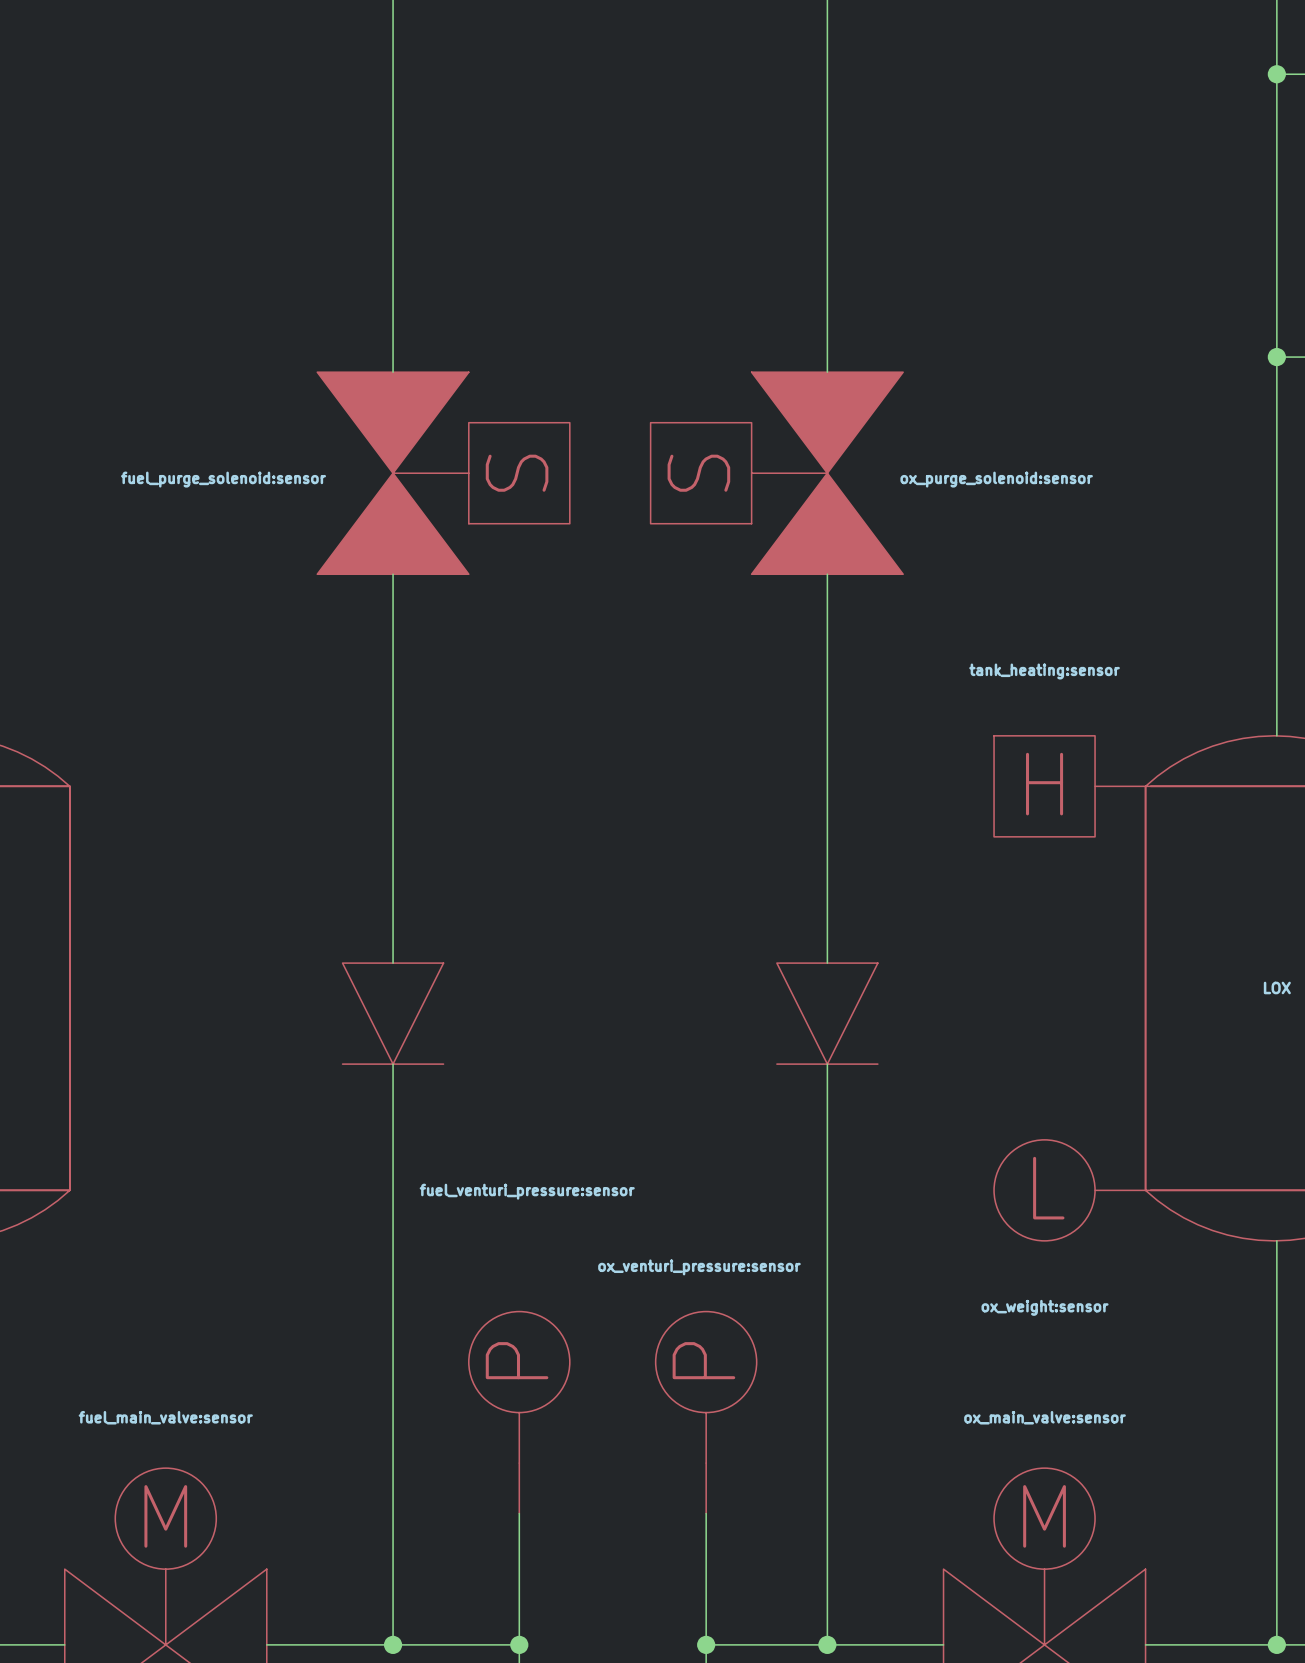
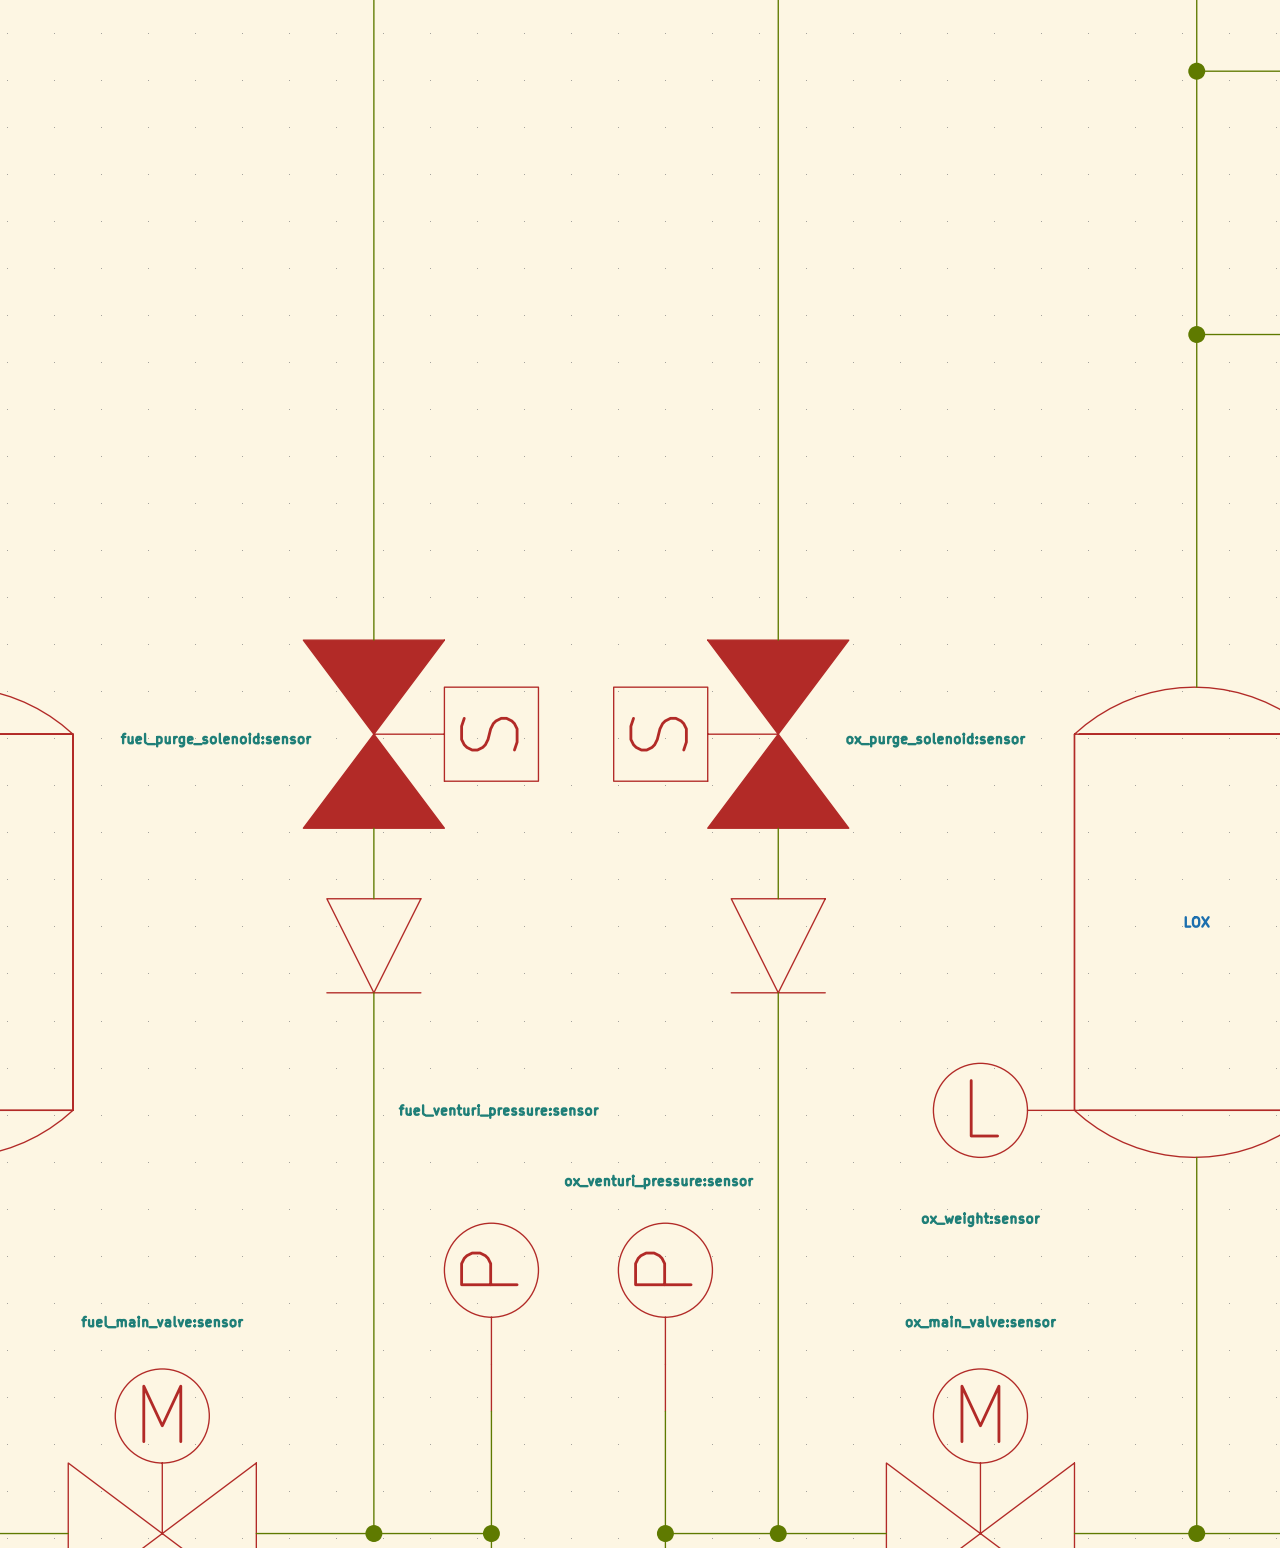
part position: (443, 473) -> (420, 734)
part position: (776, 473) -> (731, 734)
part: tank_heating:sensor (1069, 786) -> none

